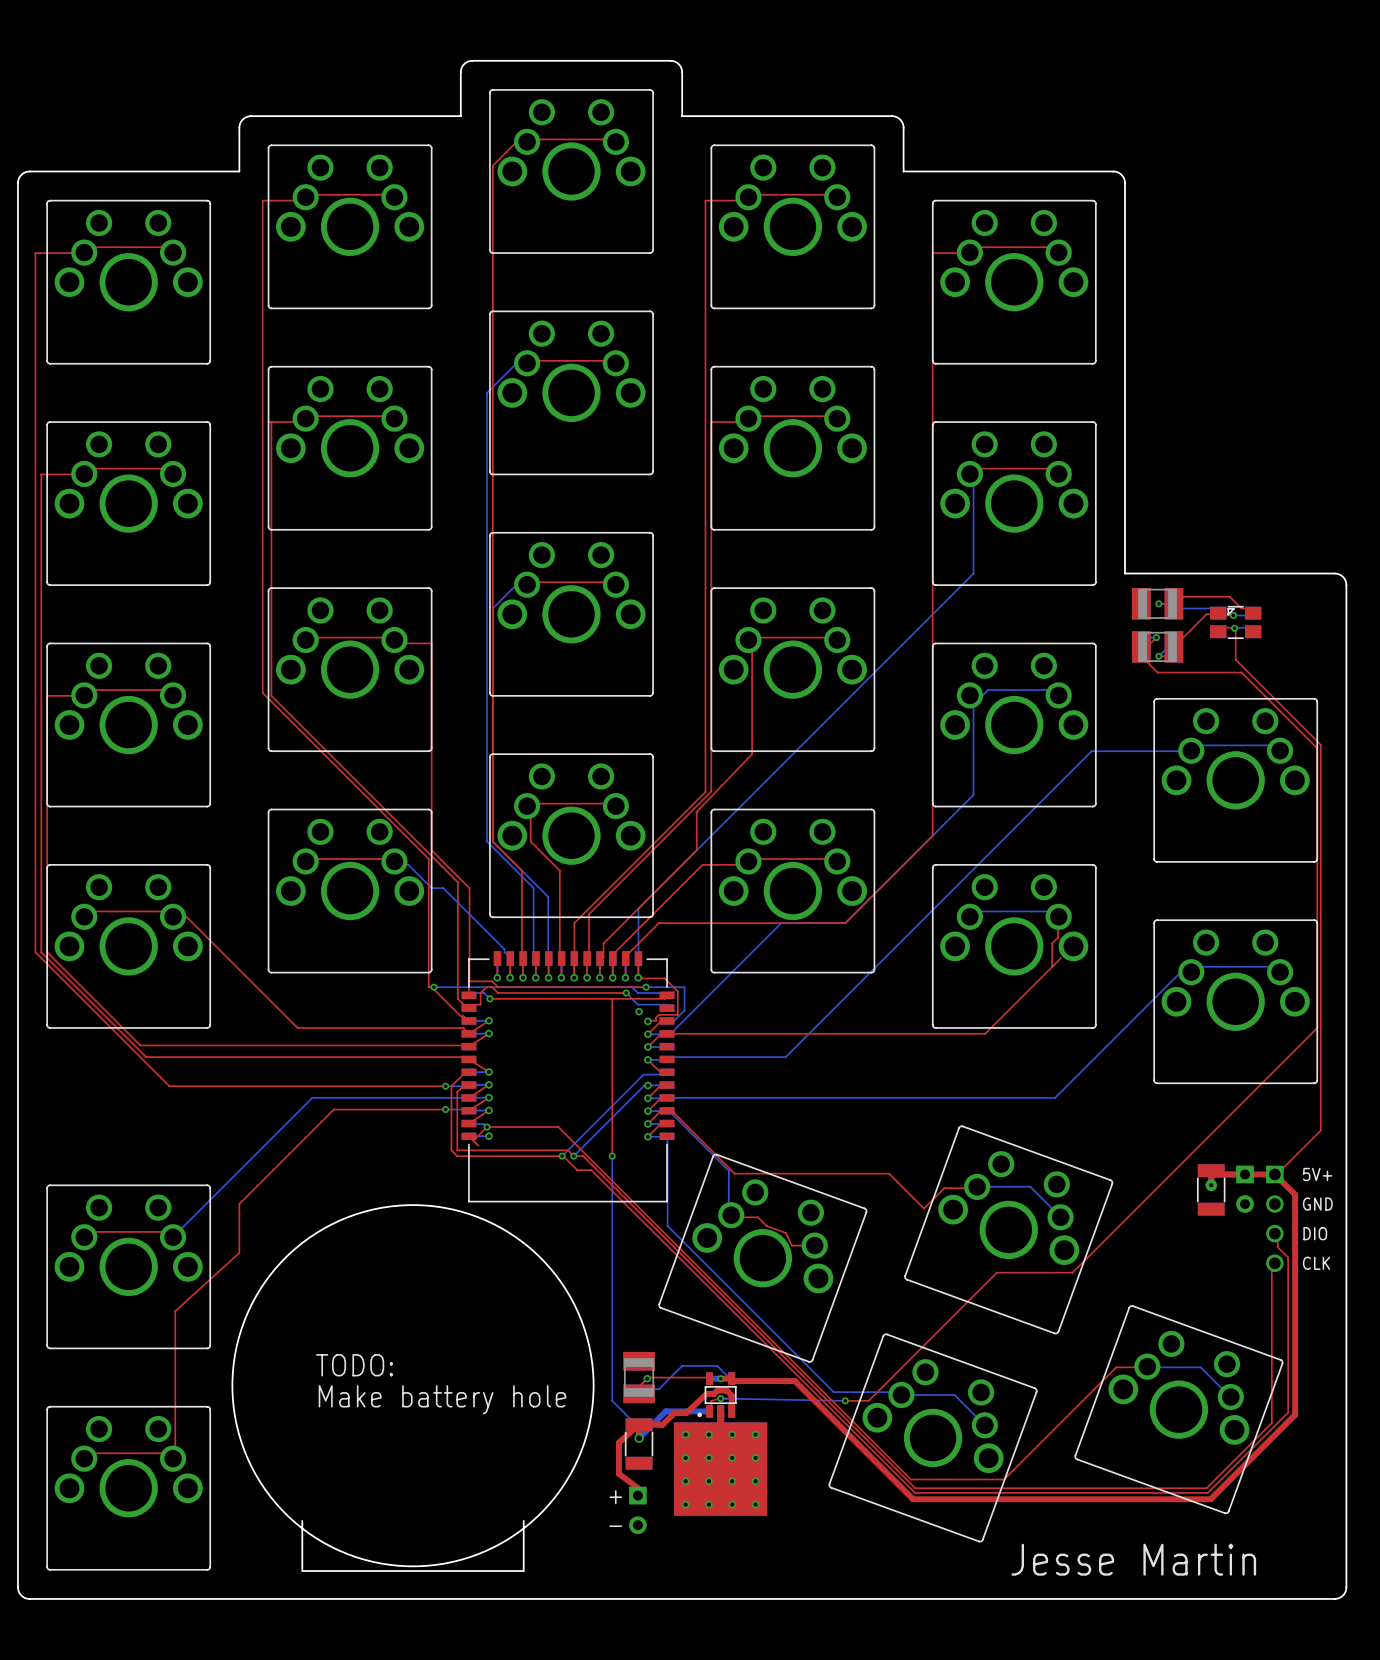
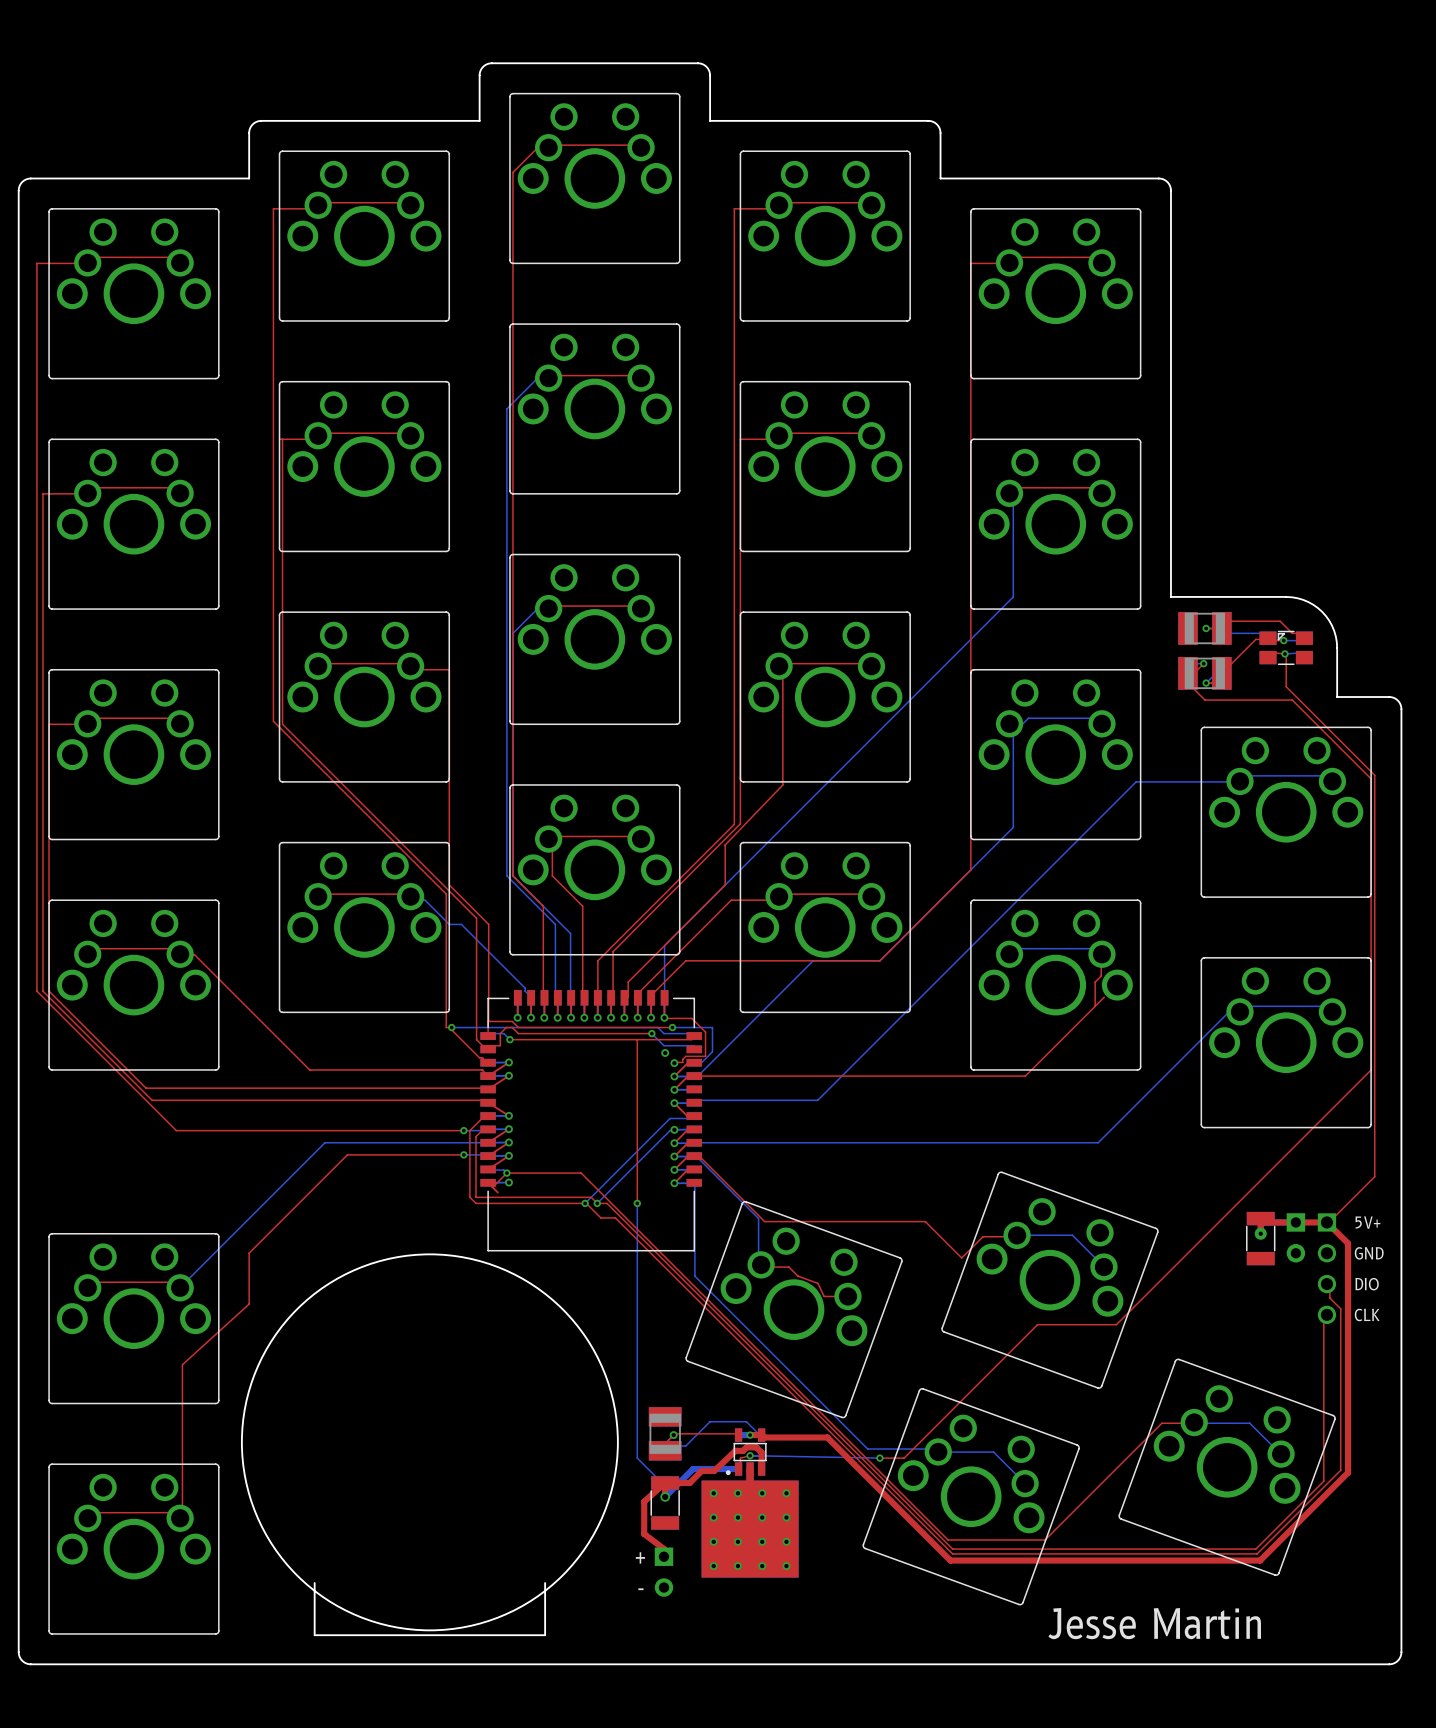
board edge: (1235, 573) (1334, 573) (1342, 576) (1346, 585) (1346, 681) -> (1286, 596) (1303, 599) (1313, 604) (1326, 616) (1332, 625) (1336, 642) (1337, 697) (1390, 697) (1398, 701) (1401, 709)
text: TODO: (354, 1365) -> none
text: Make battery hole (442, 1399) -> none

